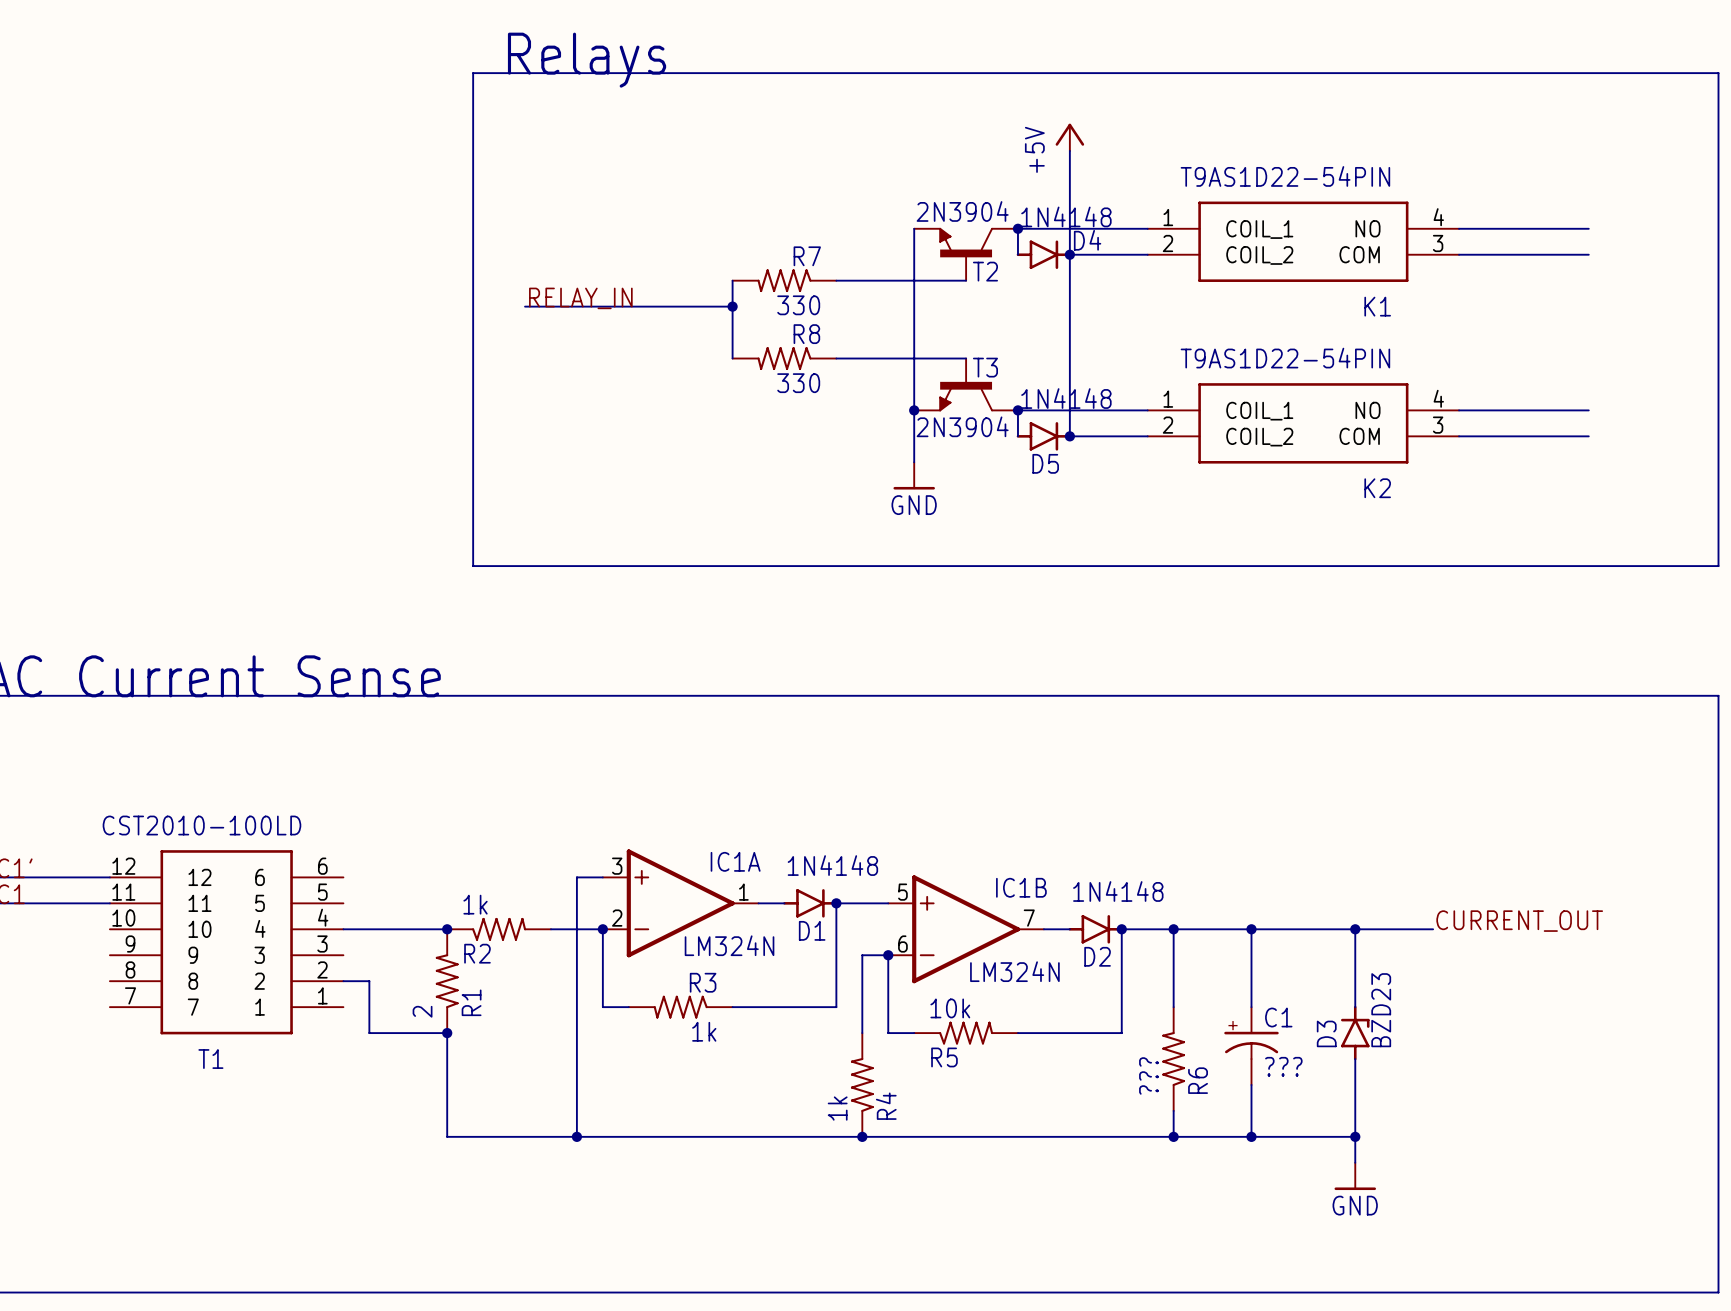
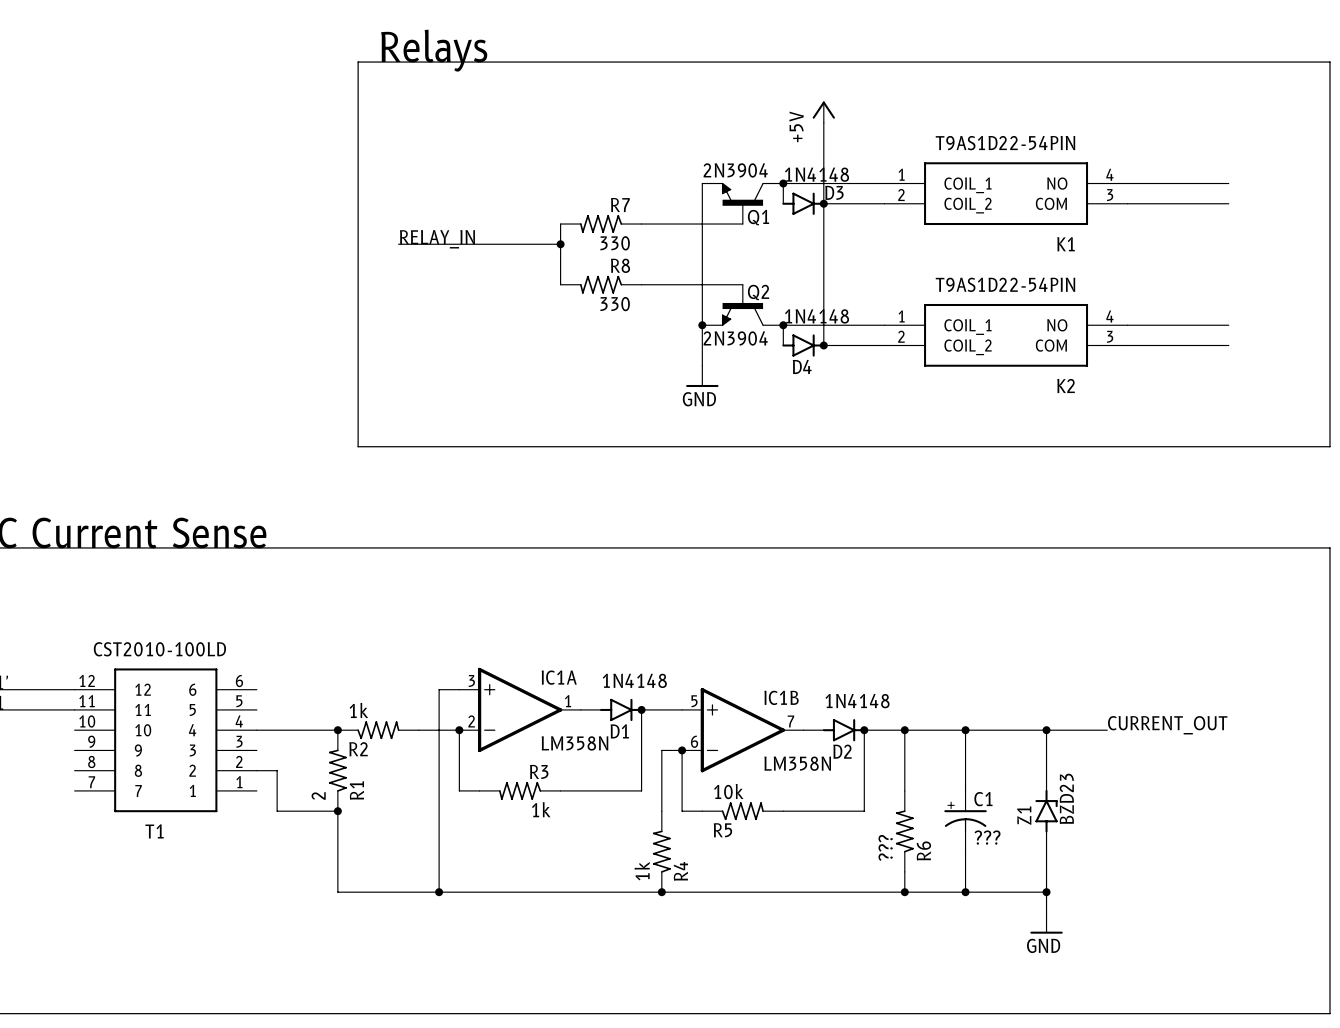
D4 name: D4 (1087, 240) -> D3 (834, 192)
T2 name: T2 (985, 271) -> Q1 (758, 217)
T3 name: T3 (985, 367) -> Q2 (758, 292)
D5 name: D5 (1045, 463) -> D4 (802, 366)
IC1A value: LM324N (729, 945) -> LM358N (574, 743)
IC1B value: LM324N (1014, 971) -> LM358N (797, 763)
D3 name: D3 (1326, 1033) -> Z1 (1024, 815)

